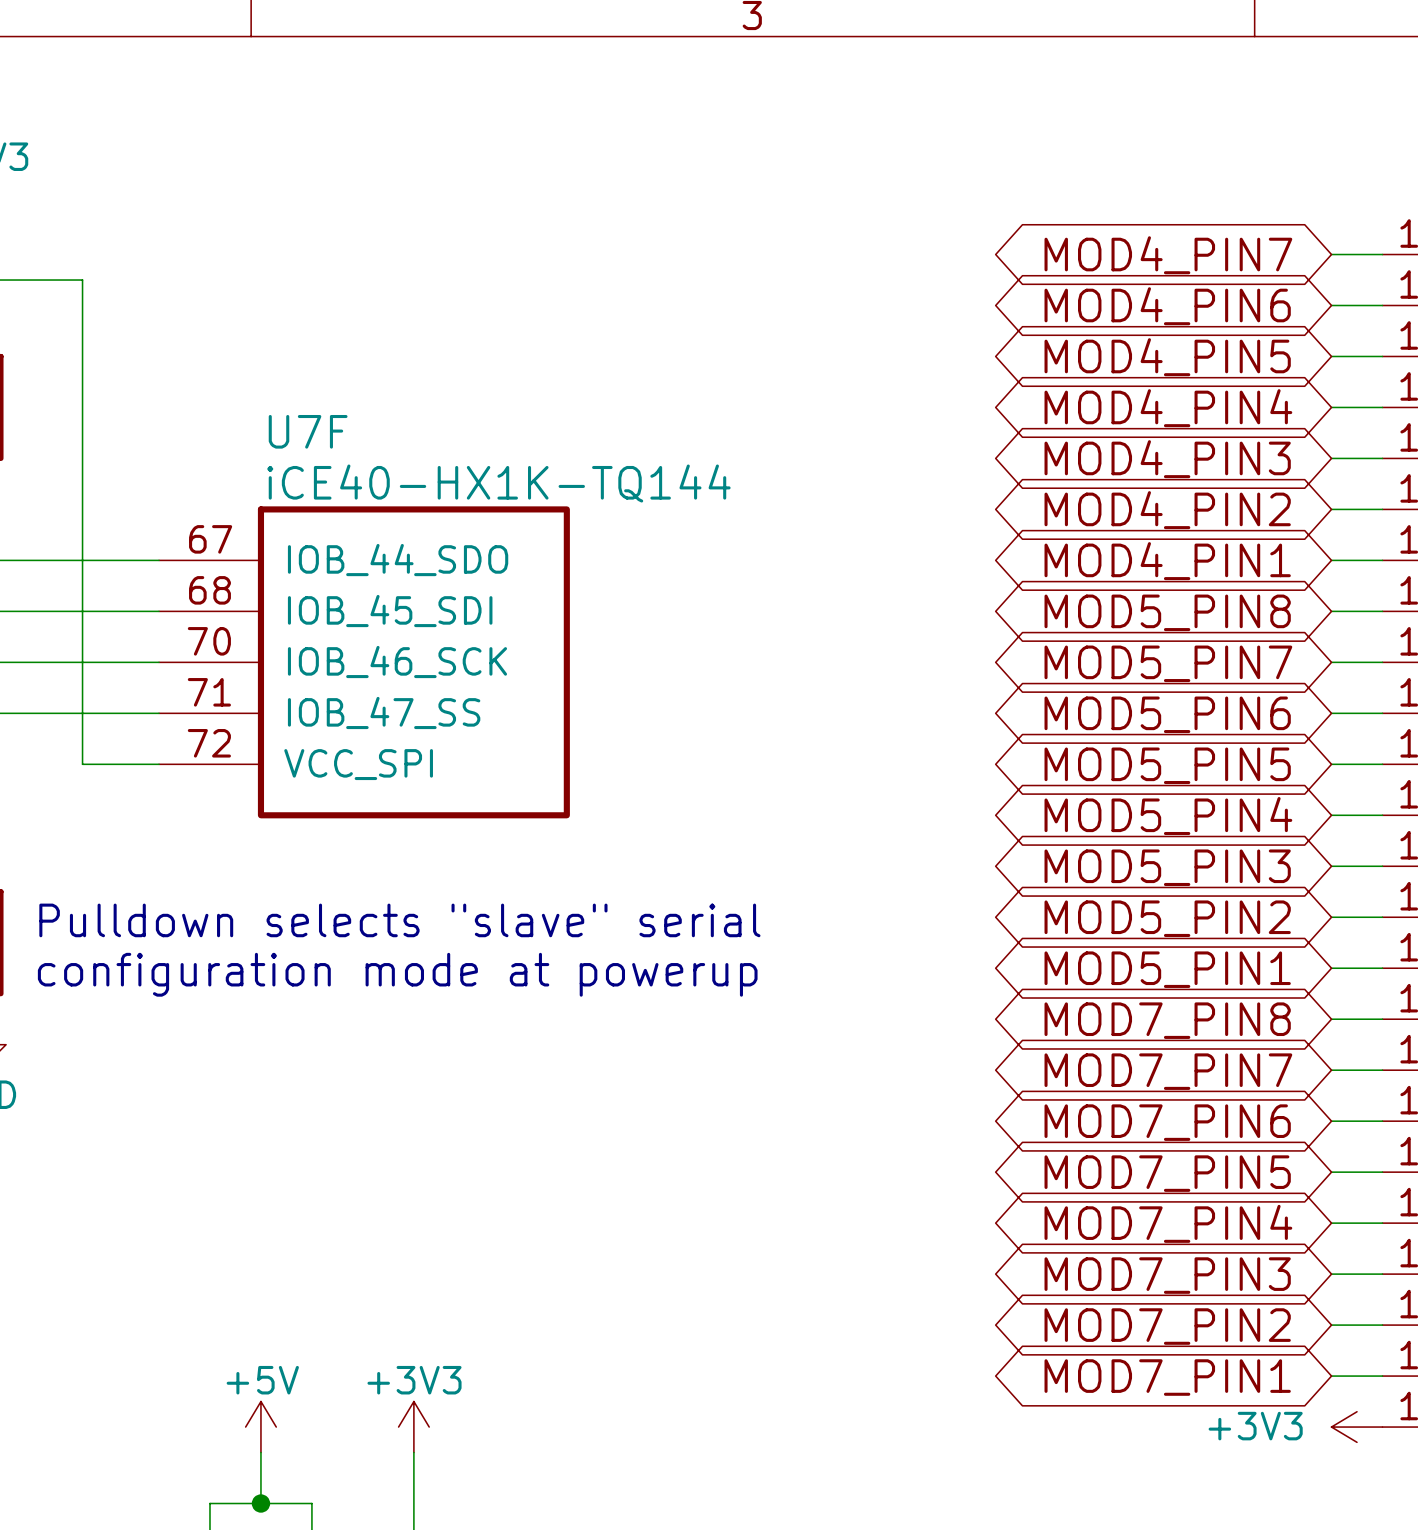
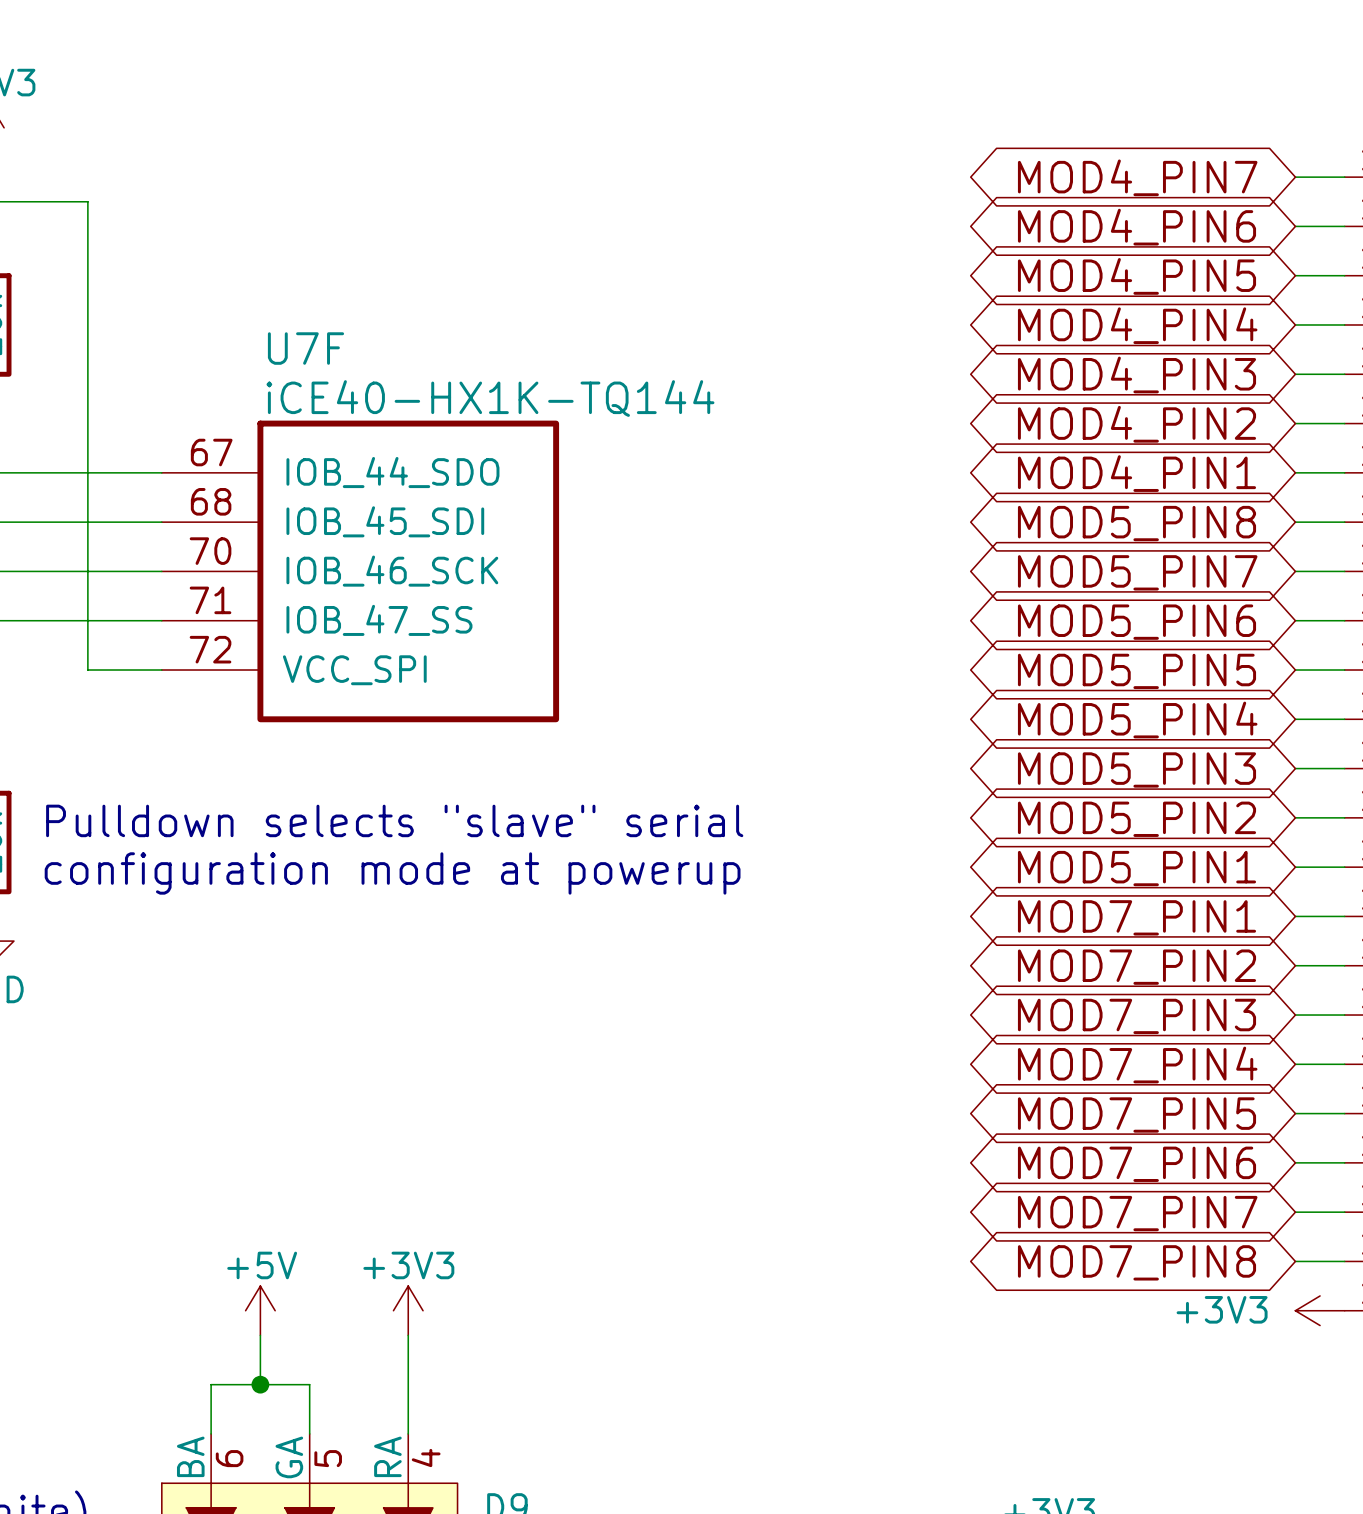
global label: MOD7_PIN8 (1167, 1020) -> MOD7_PIN1 (1136, 917)
global label: MOD7_PIN7 (1168, 1071) -> MOD7_PIN2 (1136, 967)
global label: MOD7_PIN6 (1167, 1122) -> MOD7_PIN3 (1136, 1016)
global label: MOD7_PIN5 (1167, 1173) -> MOD7_PIN4 (1137, 1065)
global label: MOD7_PIN4 (1168, 1223) -> MOD7_PIN5 (1136, 1115)
global label: MOD7_PIN3 (1167, 1275) -> MOD7_PIN6 (1136, 1164)
global label: MOD7_PIN2 (1167, 1326) -> MOD7_PIN7 (1137, 1213)
global label: MOD7_PIN1 (1167, 1377) -> MOD7_PIN8 (1136, 1262)

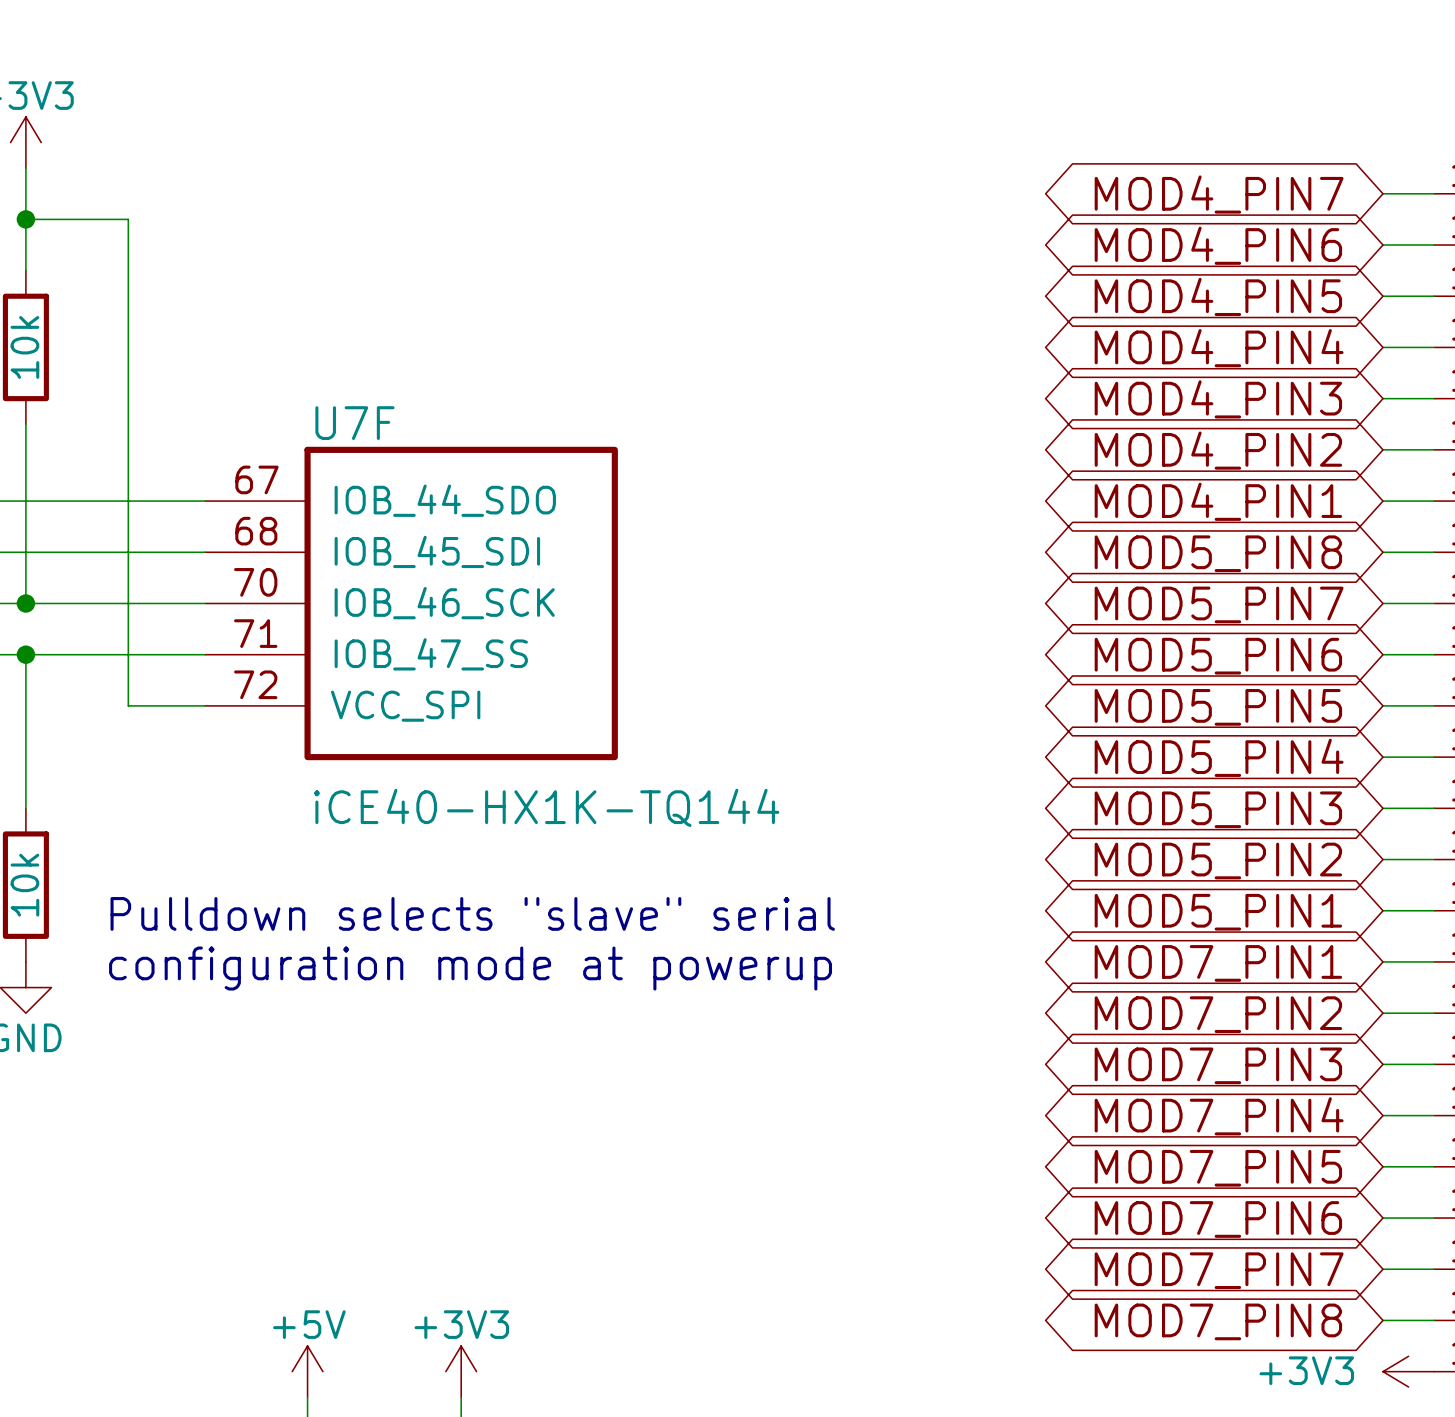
U7F name position: U7F (305, 348) -> U7F (354, 423)
U7F value position: iCE40-HX1K-TQ144 (490, 398) -> iCE40-HX1K-TQ144 (546, 807)
text position: Pulldown selects "slave" serial (394, 820) -> Pulldown selects "slave" serial (472, 913)
text position: configuration mode at powerup (392, 873) -> configuration mode at powerup (470, 968)

